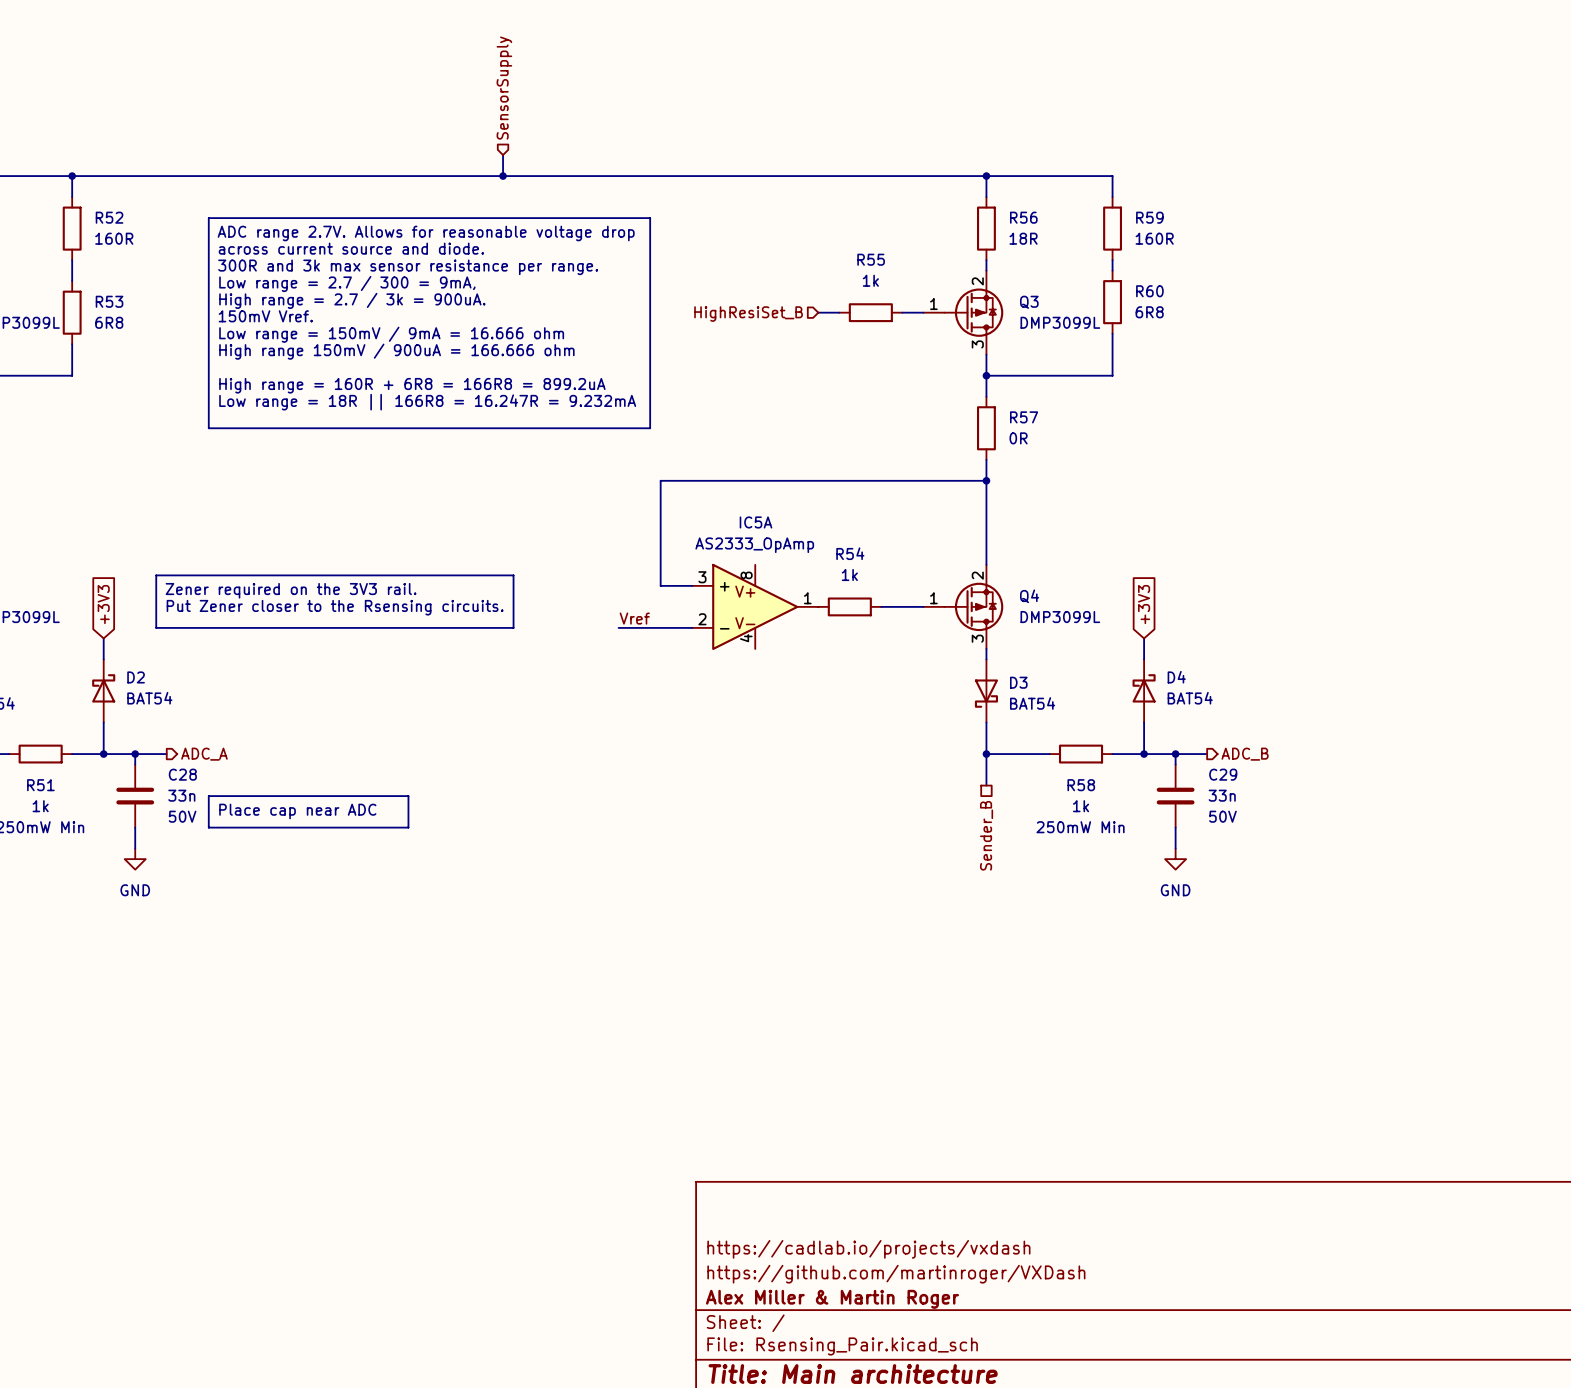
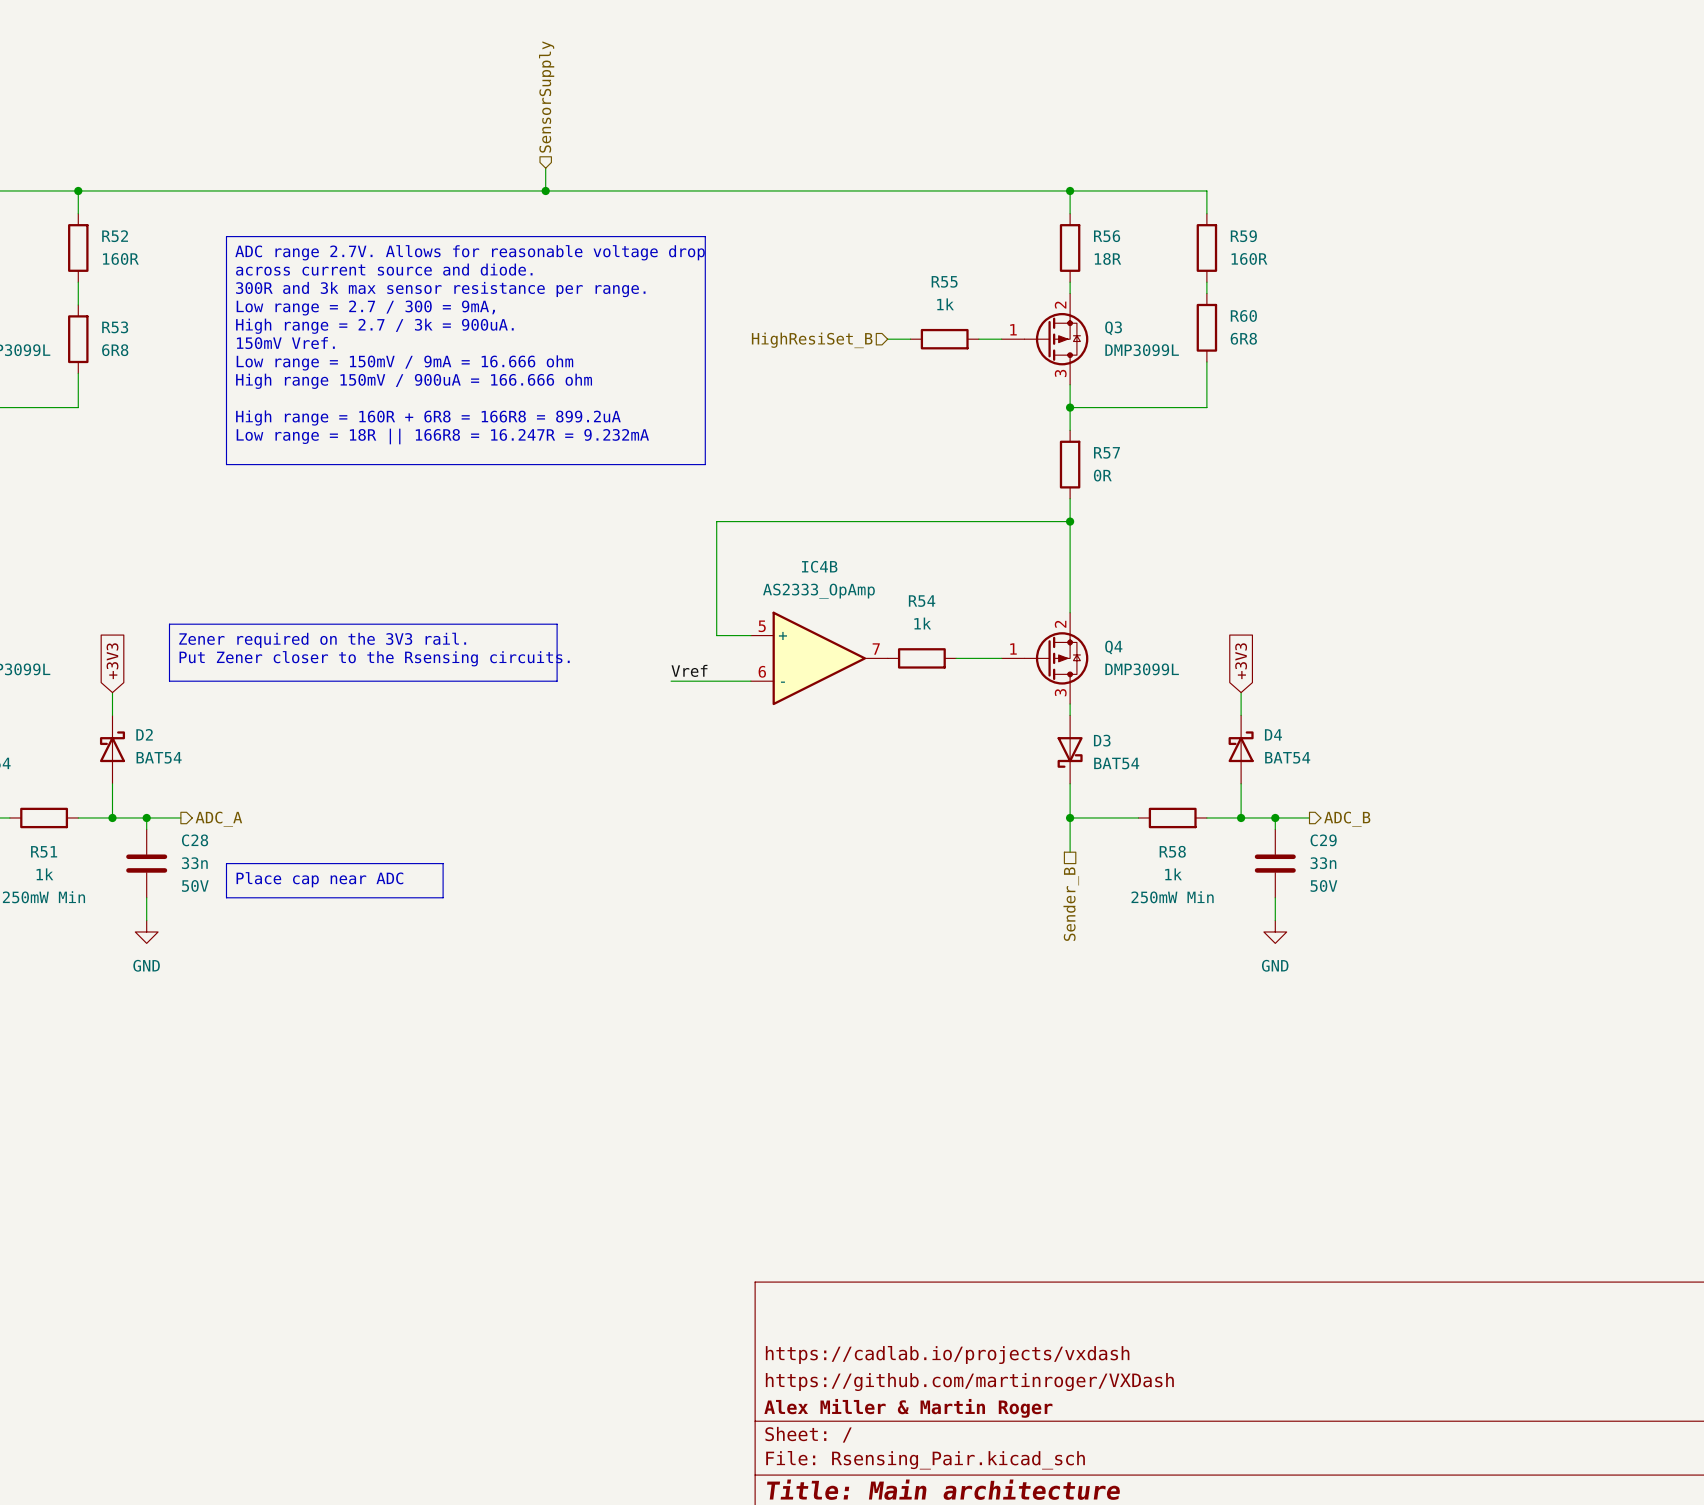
IC5A: AS2333_OpAmp (755, 606) -> none
IC4B: none -> AS2333_OpAmp (819, 658)

